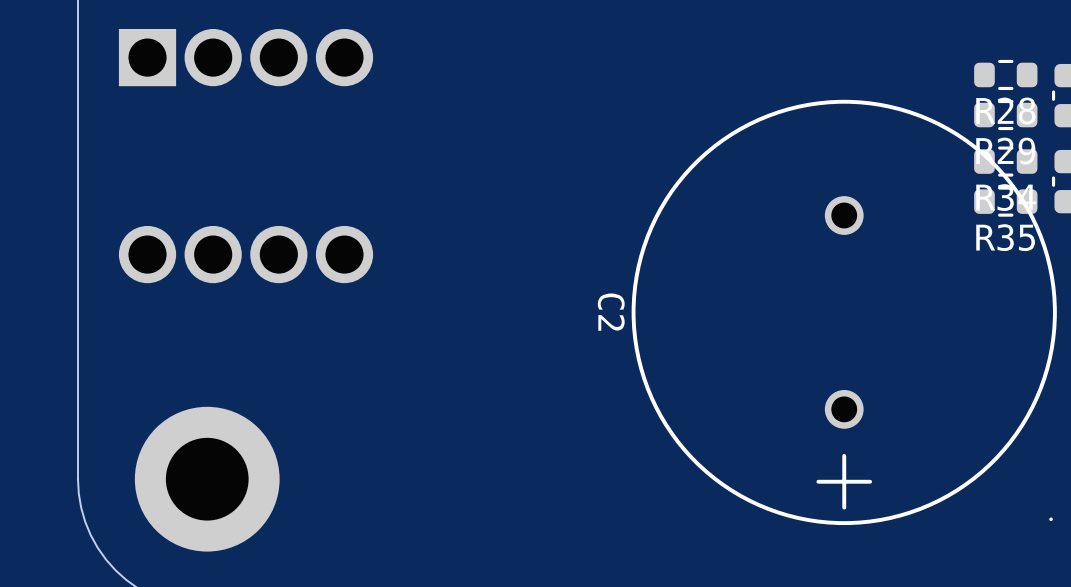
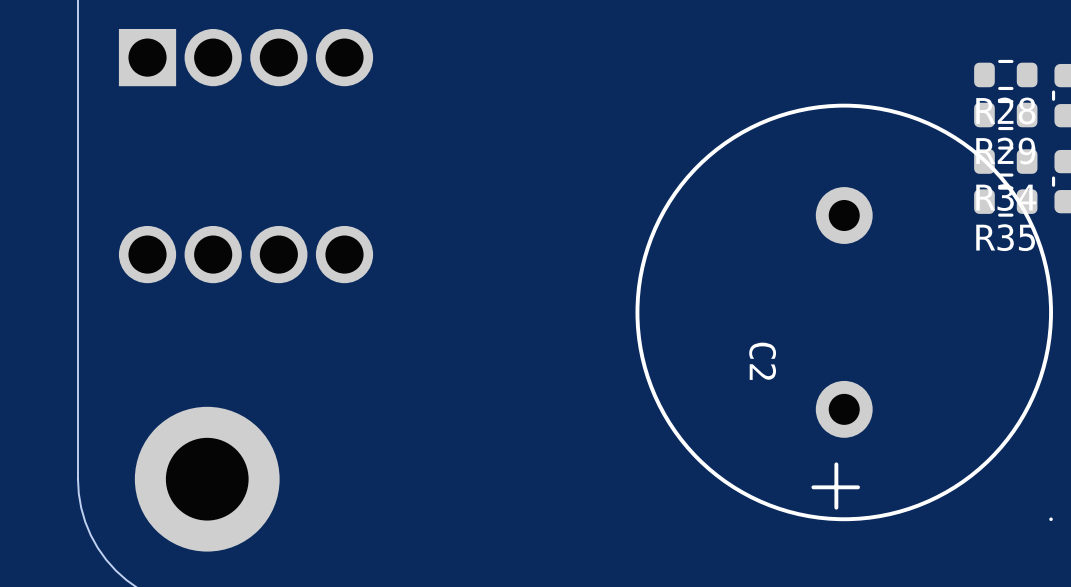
C2 footprint: [631, 99, 1057, 526] -> [635, 103, 1053, 522]
C2 name position: C2 (611, 312) -> C2 (762, 361)

